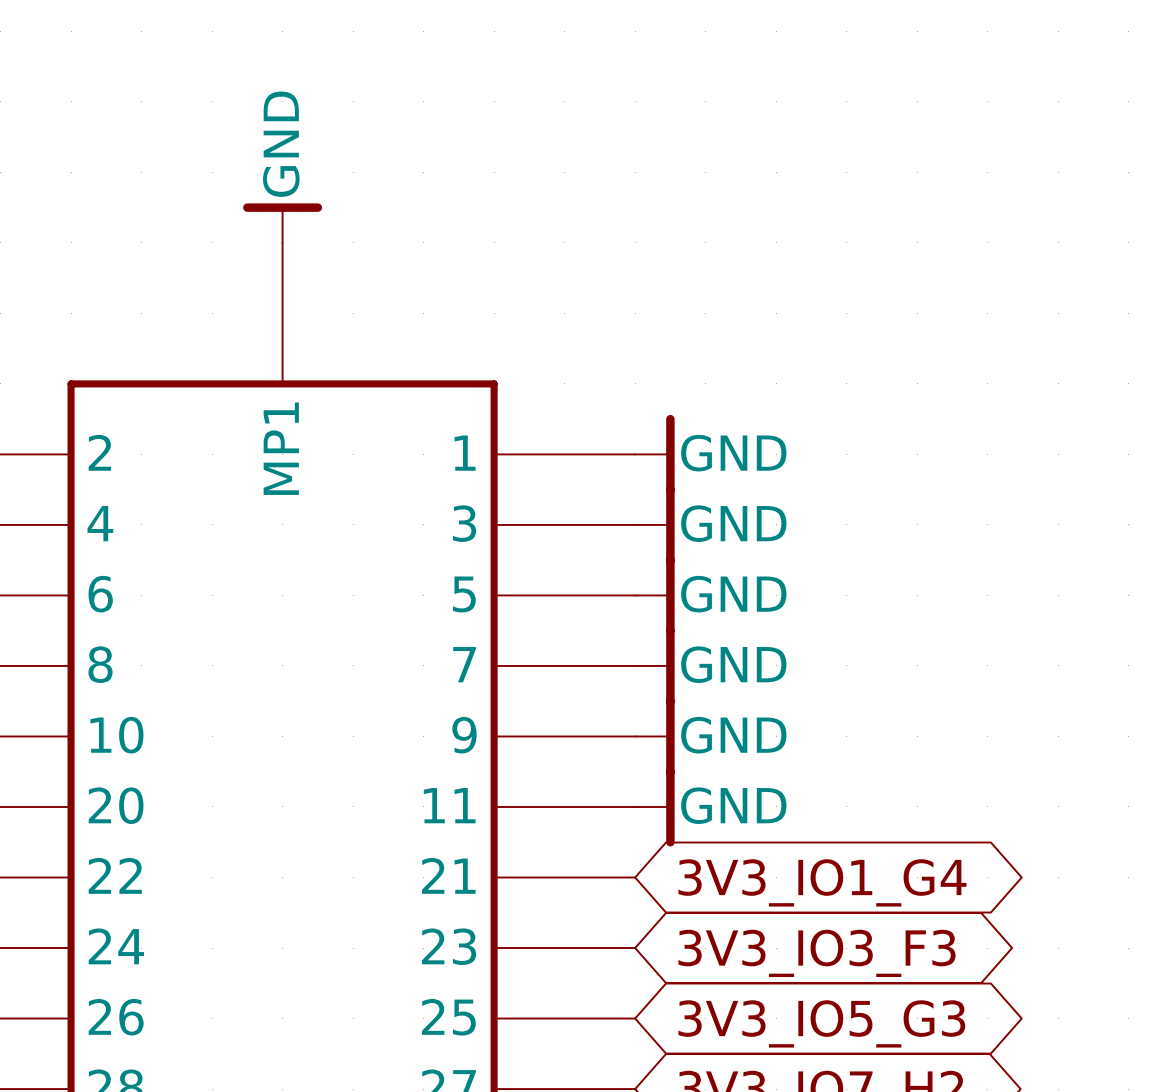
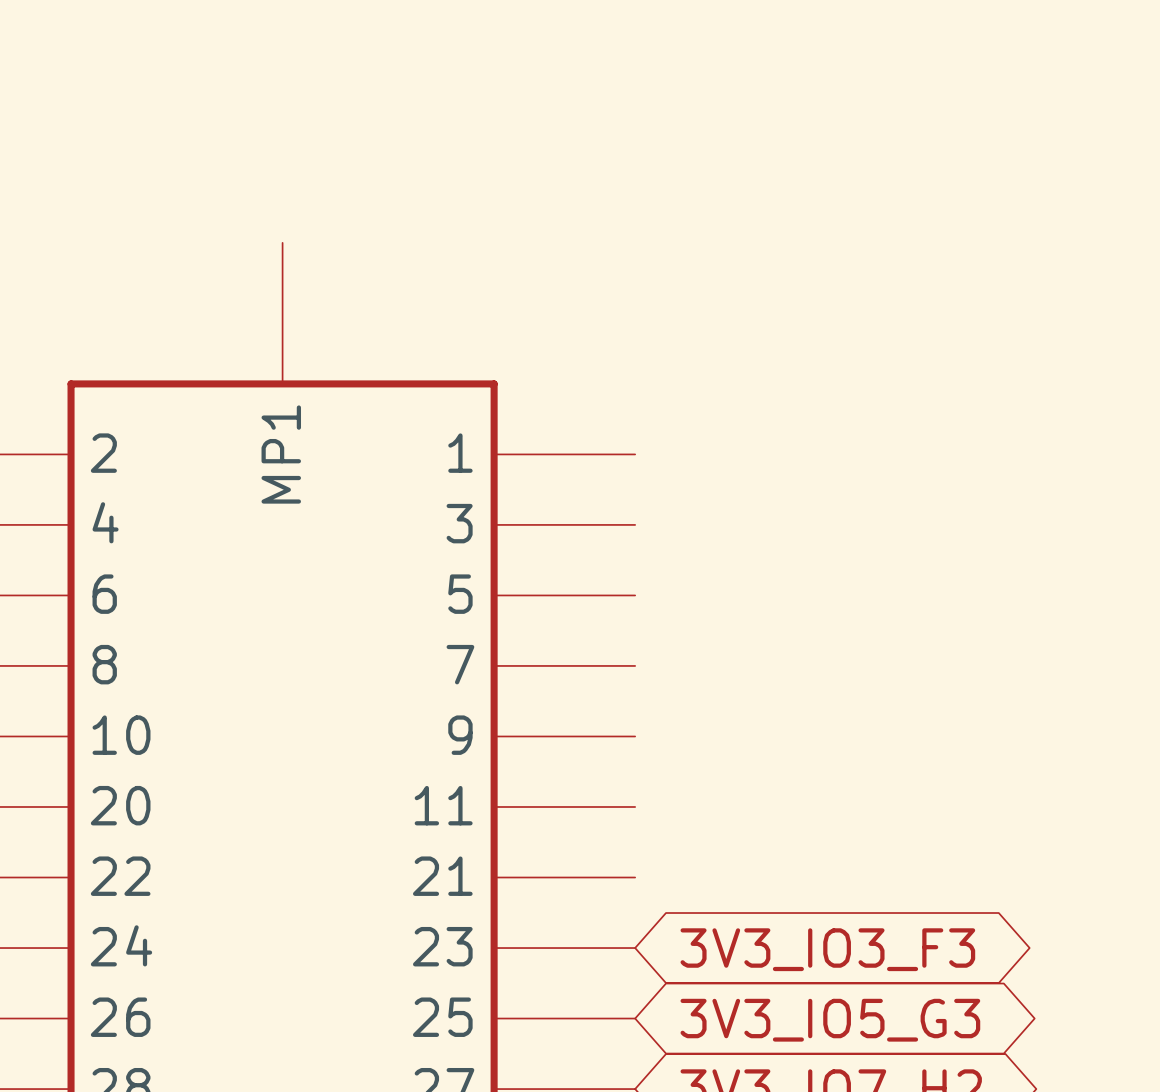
power symbol: GND (282, 223) -> none
power symbol: GND (654, 454) -> none
power symbol: GND (654, 524) -> none
power symbol: GND (654, 595) -> none
power symbol: GND (654, 665) -> none
power symbol: GND (654, 736) -> none
power symbol: GND (654, 806) -> none
global label: 3V3_IO1_G4 (822, 882) -> none

